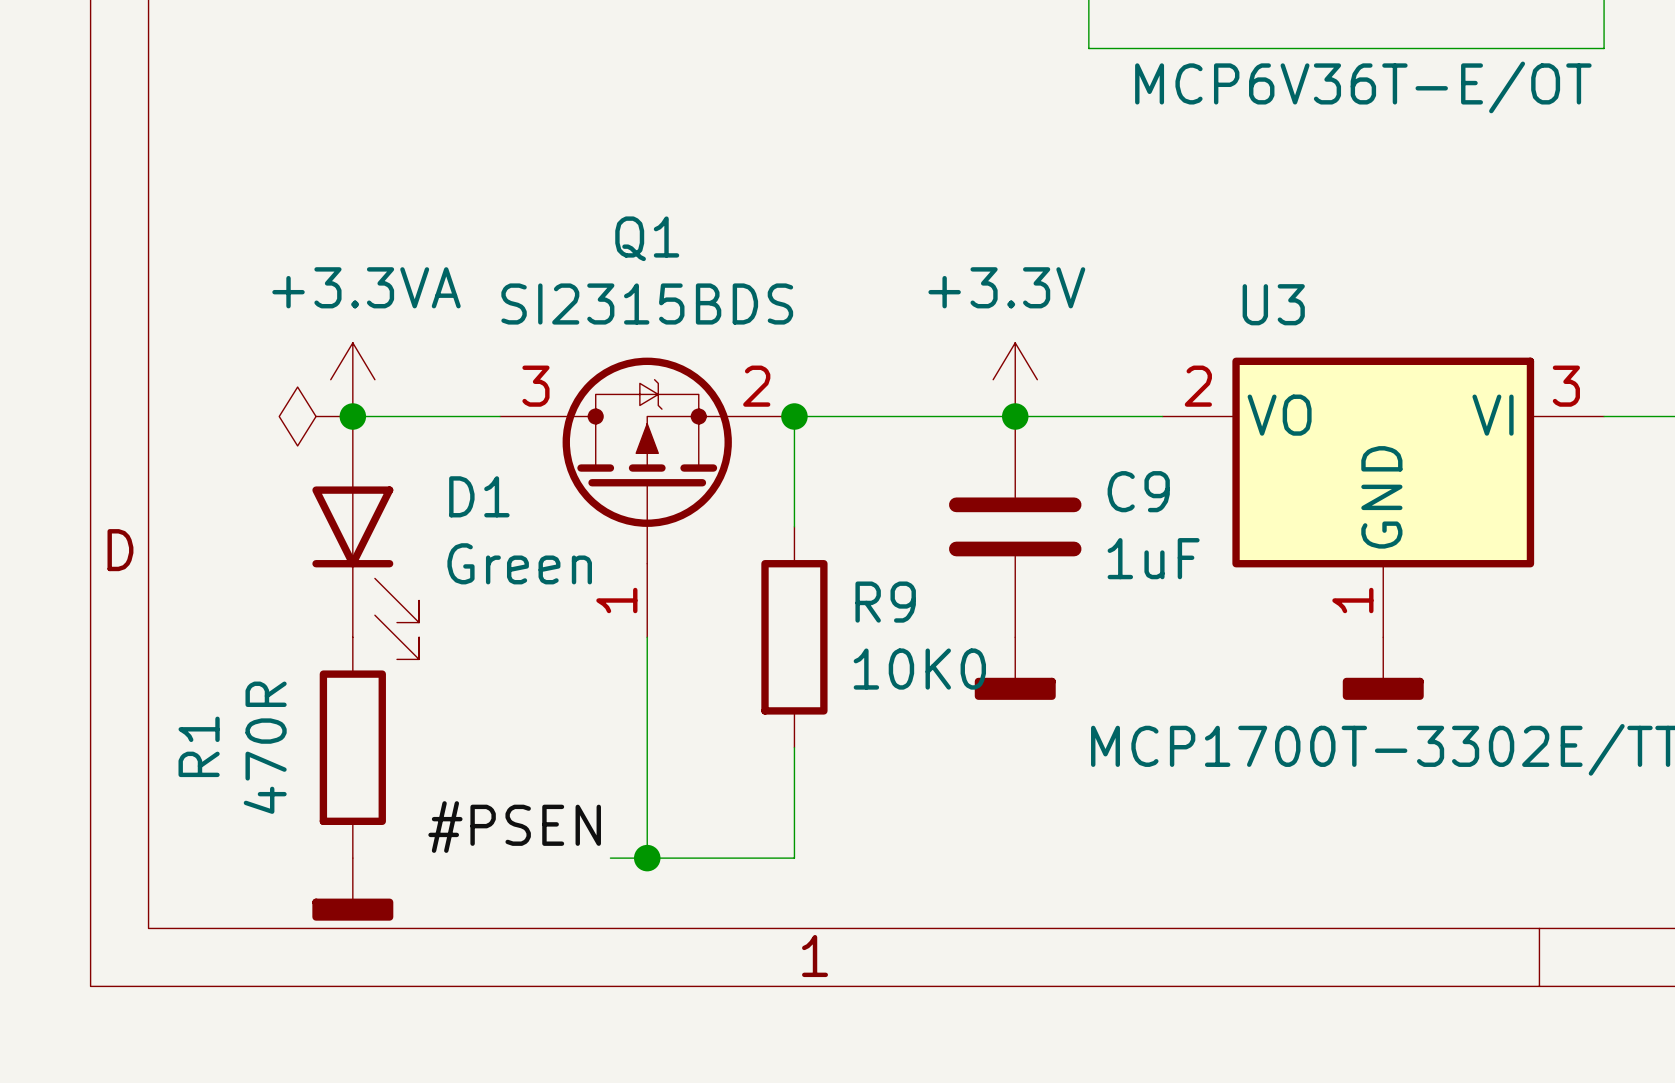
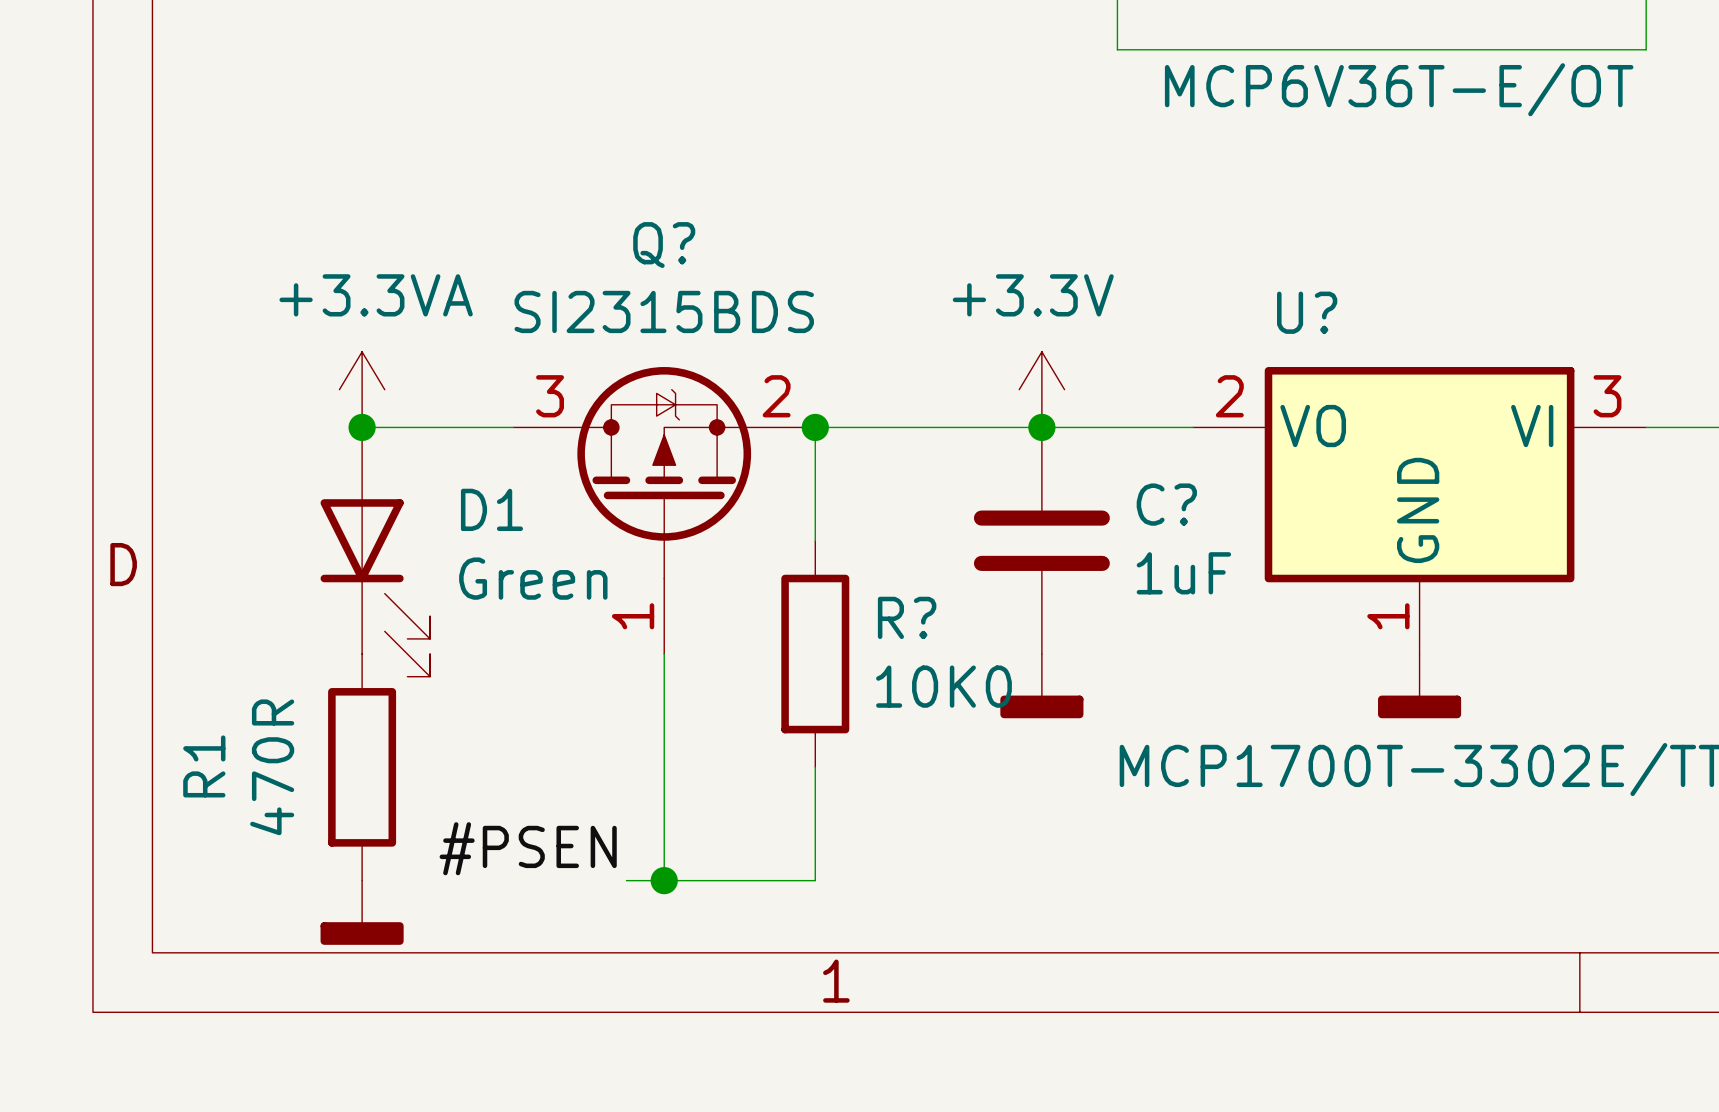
Q1 name: Q1 (647, 238) -> Q? (664, 245)
U3 name: U3 (1273, 304) -> U? (1307, 312)
power symbol: (316, 416) -> none
C9 name: C9 (1138, 491) -> C? (1166, 504)
R9 name: R9 (885, 602) -> R? (907, 617)

